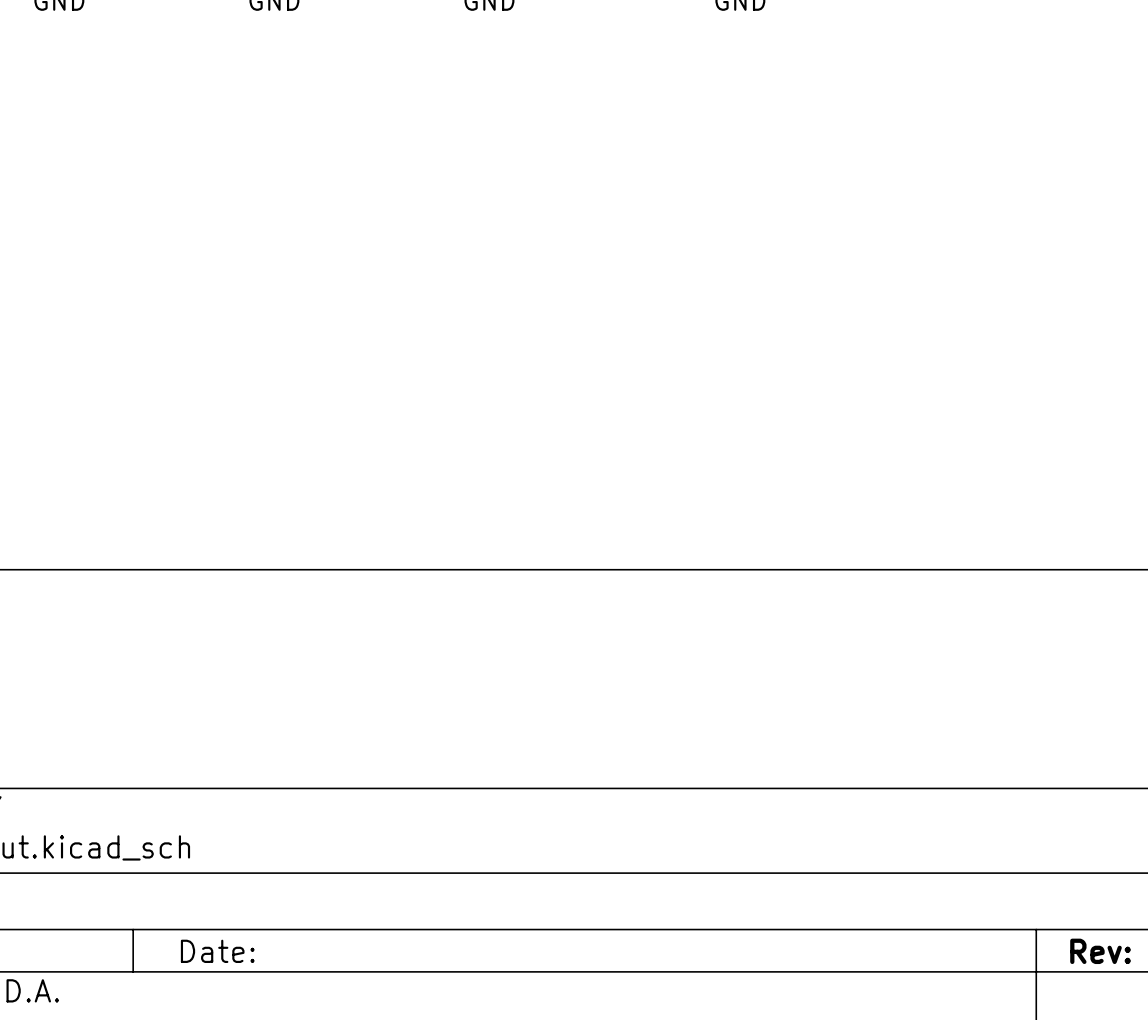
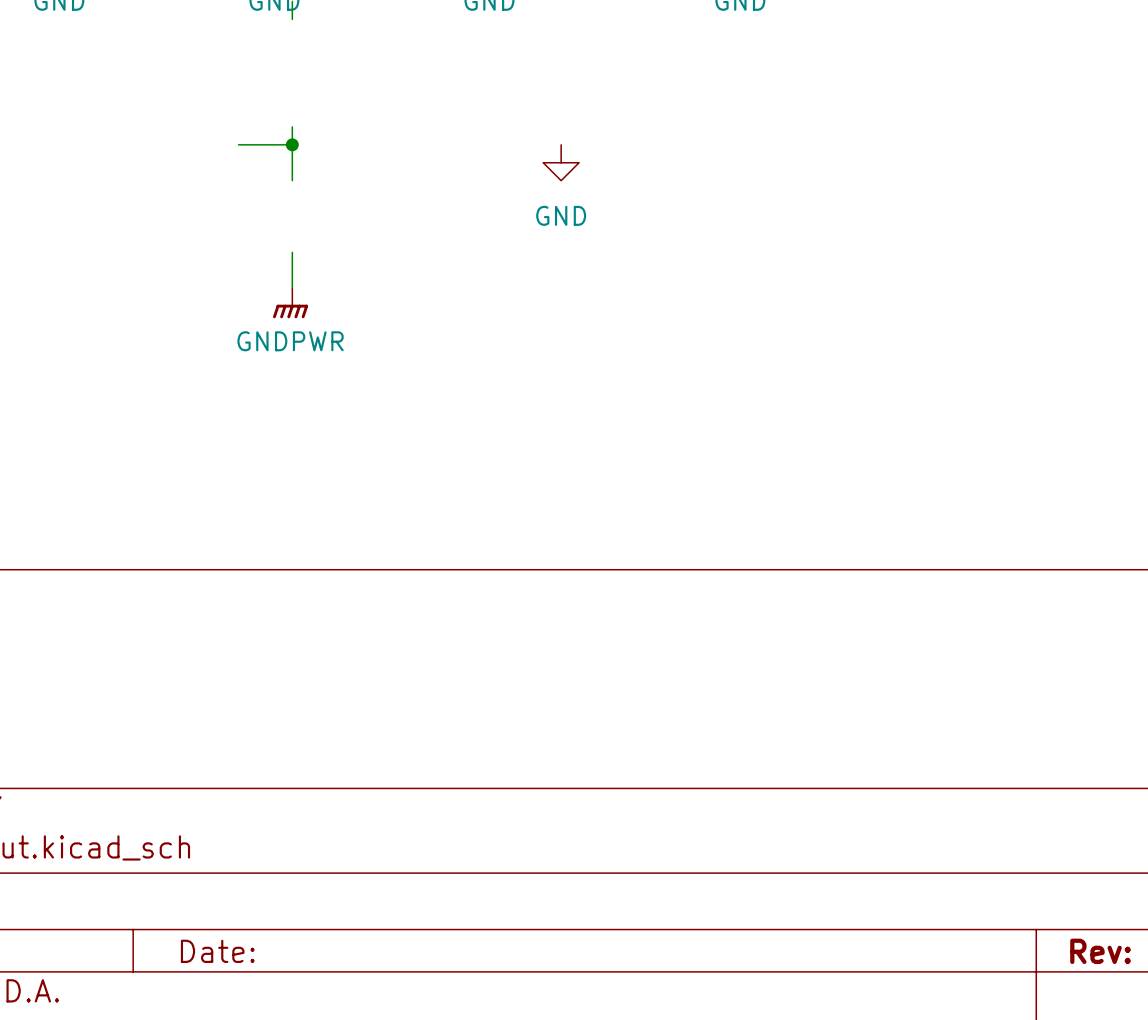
wire: none -> (292, 1) (292, 19)
wire: none -> (292, 126) (292, 180)
wire: none -> (238, 144) (292, 144)
junction: none -> (292, 144)
power symbol: none -> GND (561, 162)
wire: none -> (292, 252) (292, 288)
power symbol: none -> GNDPWR (290, 303)

